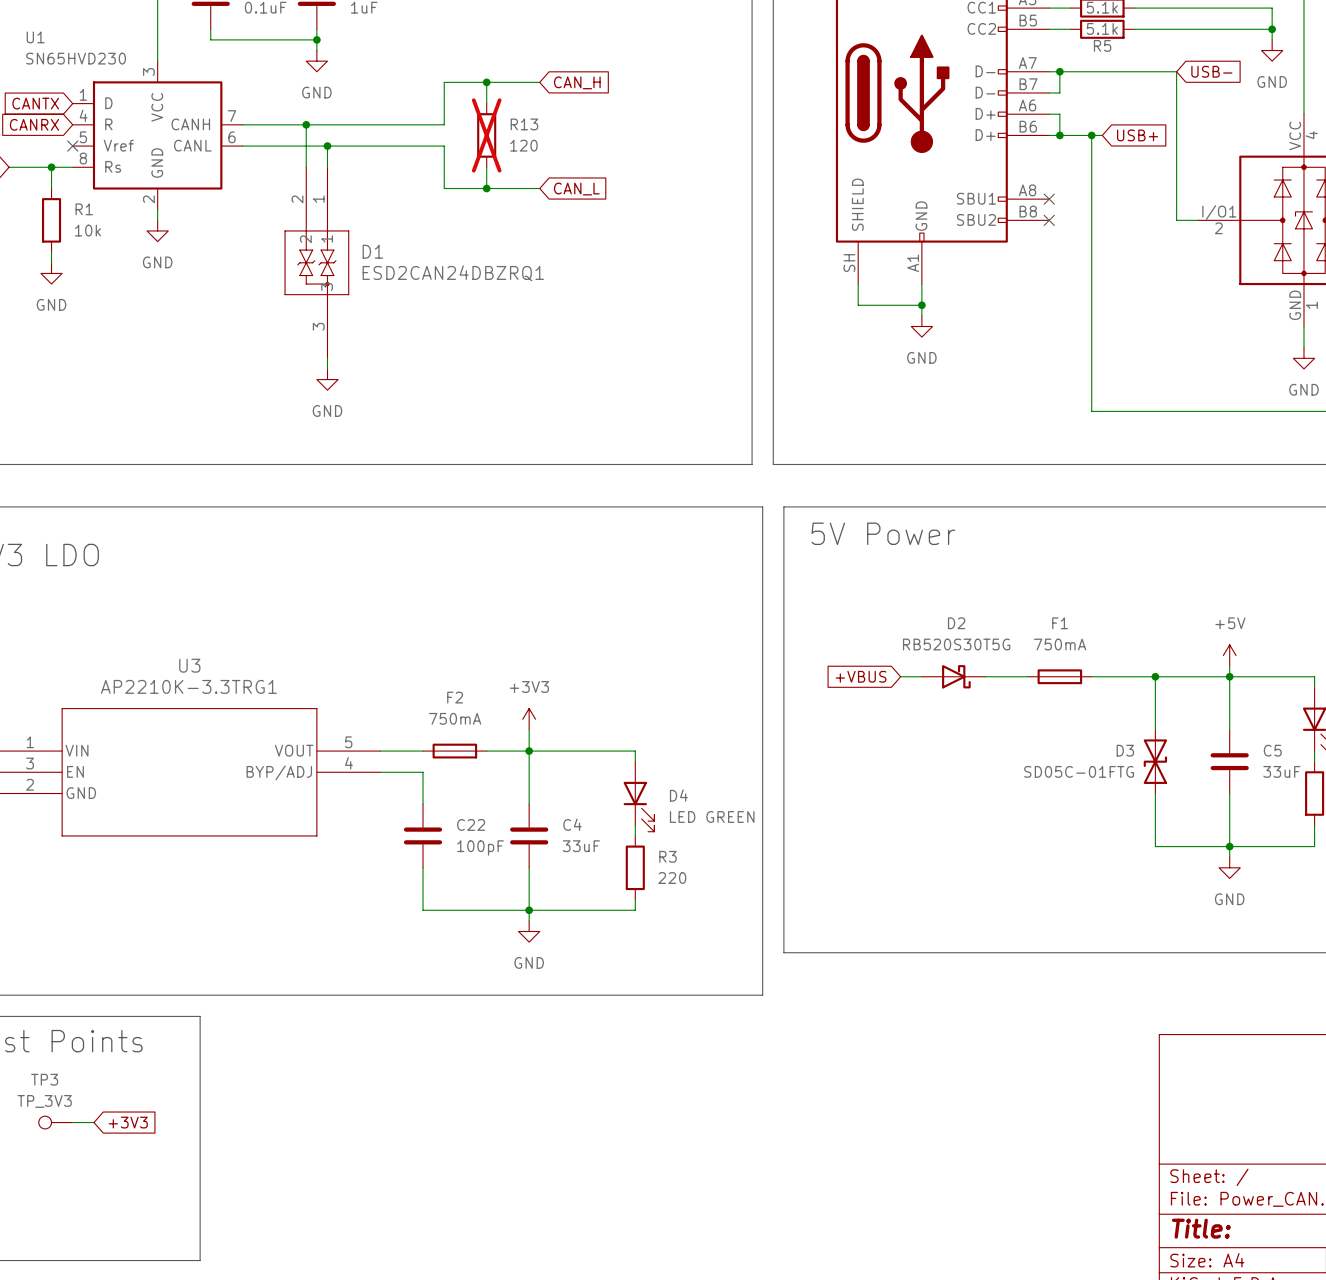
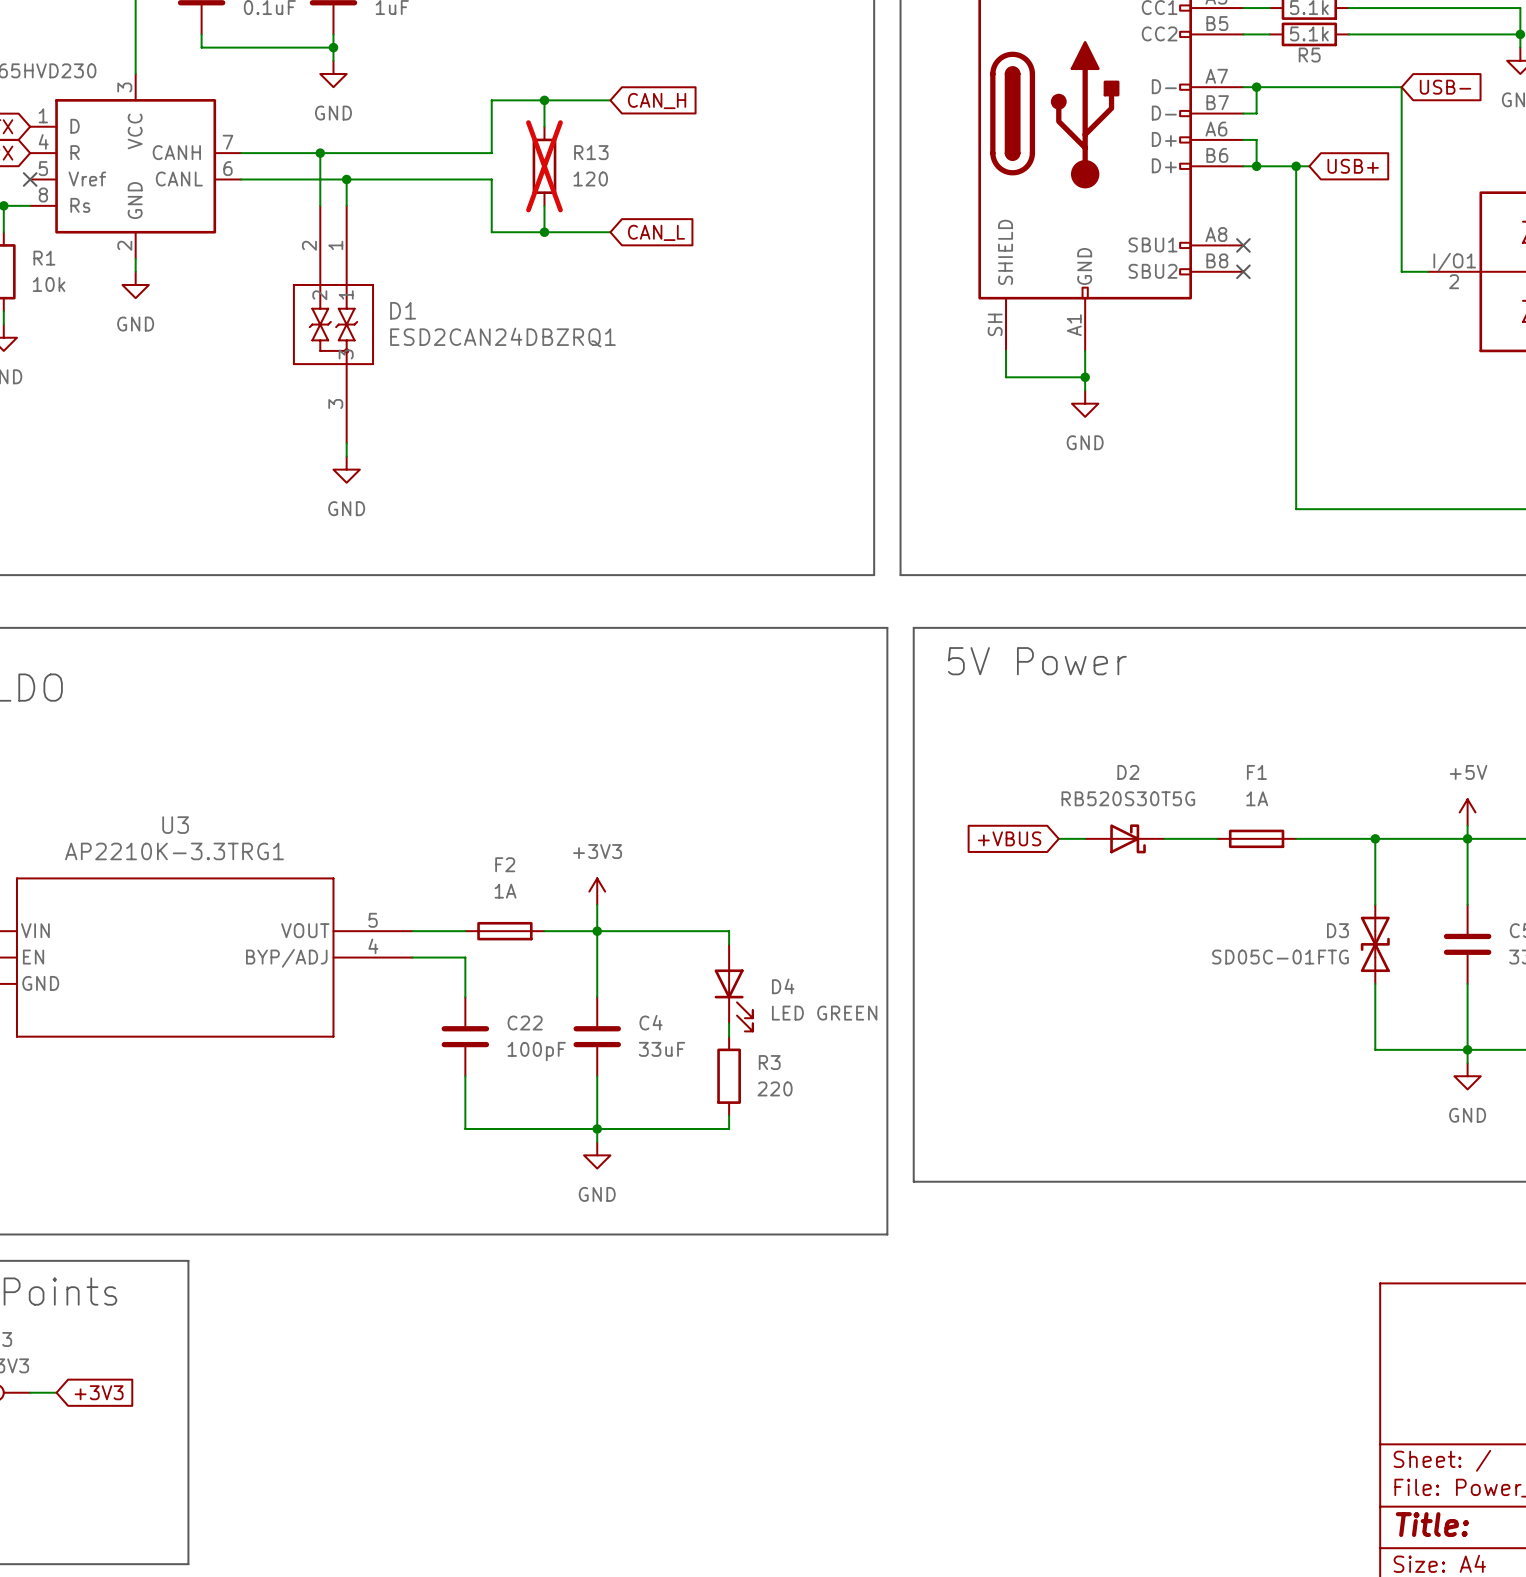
F1 value: 750mA (1060, 644) -> 1A (1257, 798)
F2 value: 750mA (455, 718) -> 1A (505, 891)

